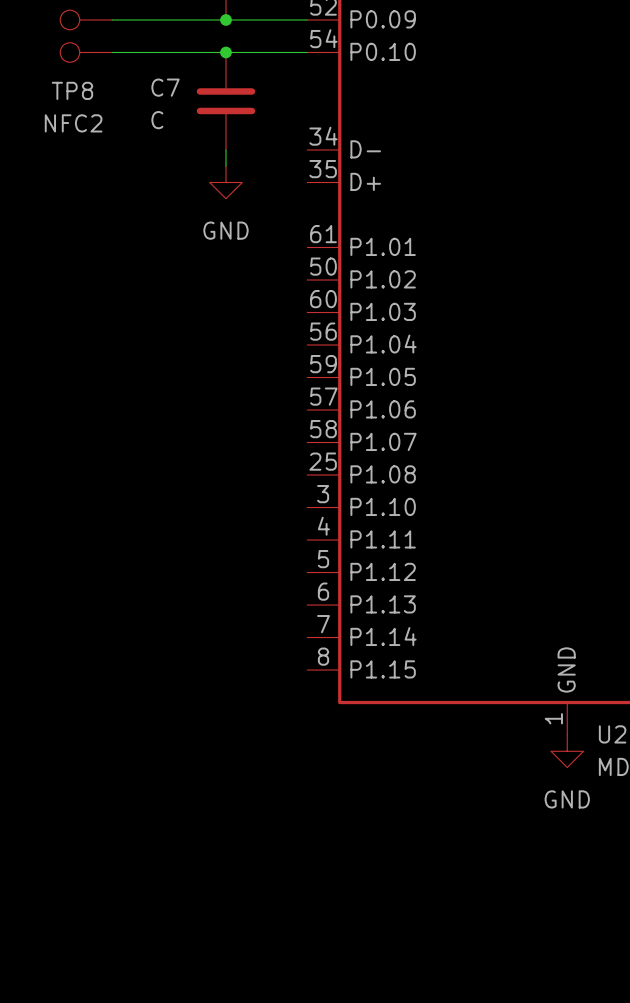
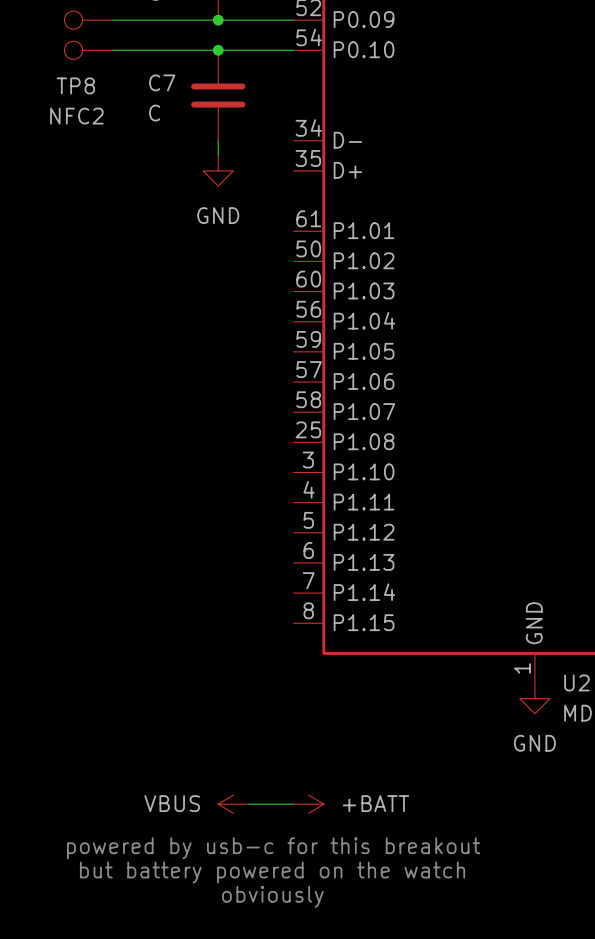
power symbol: none -> VBUS (233, 804)
wire: none -> (248, 804) (293, 804)
power symbol: none -> +BATT (308, 804)
text: none -> powered by usb-c for this breakout (273, 848)
text: none -> but battery powered on the watch (272, 872)
text: none -> obviously (272, 896)

